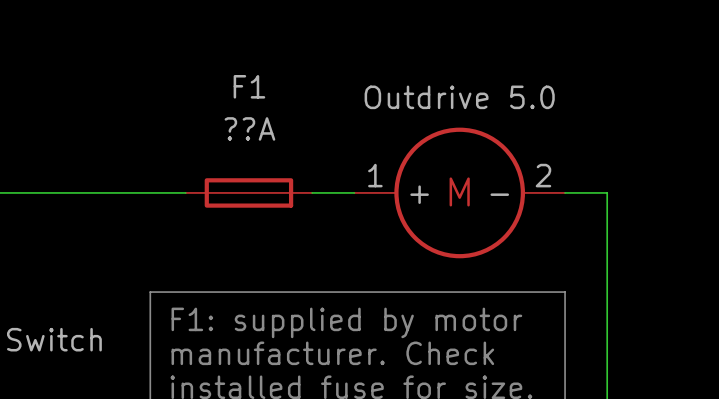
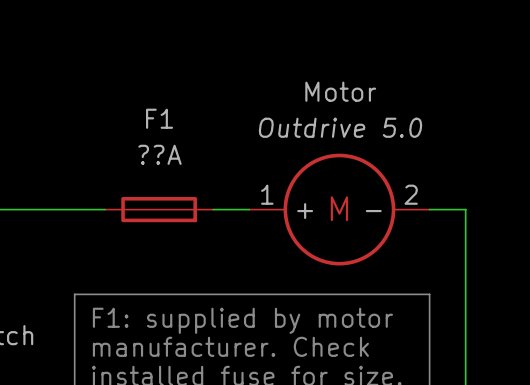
part text: none -> Motor (340, 91)
part value: Outdrive 5.0 (459, 97) -> none
part text: none -> Outdrive 5.0 (340, 127)

